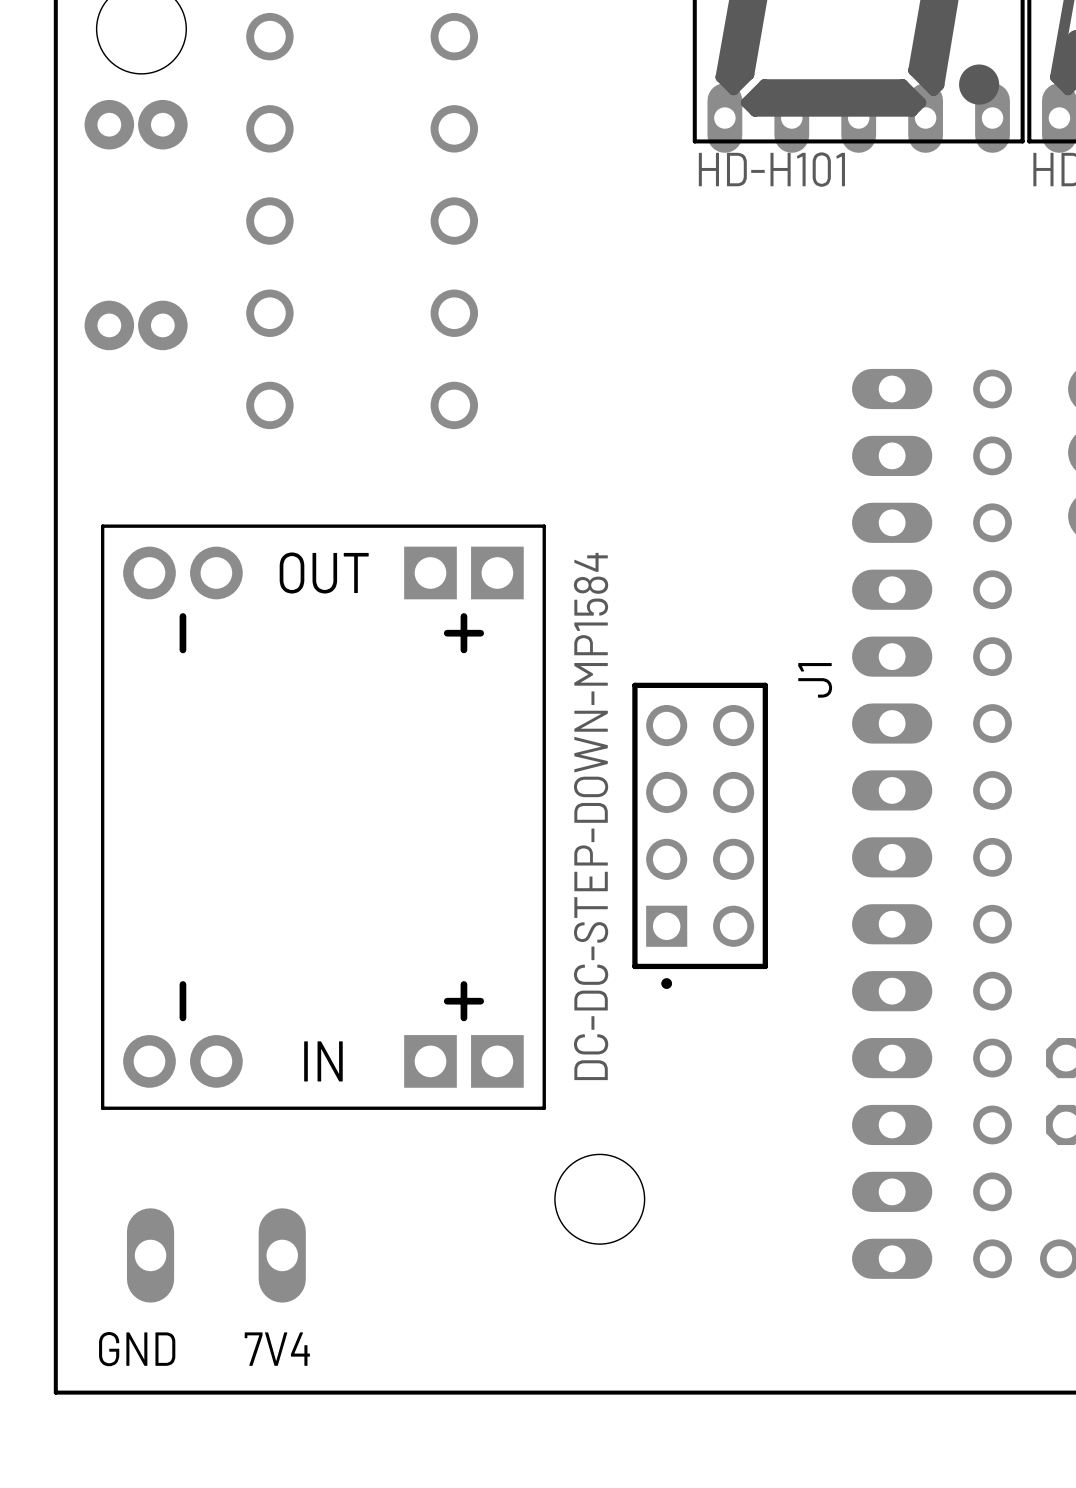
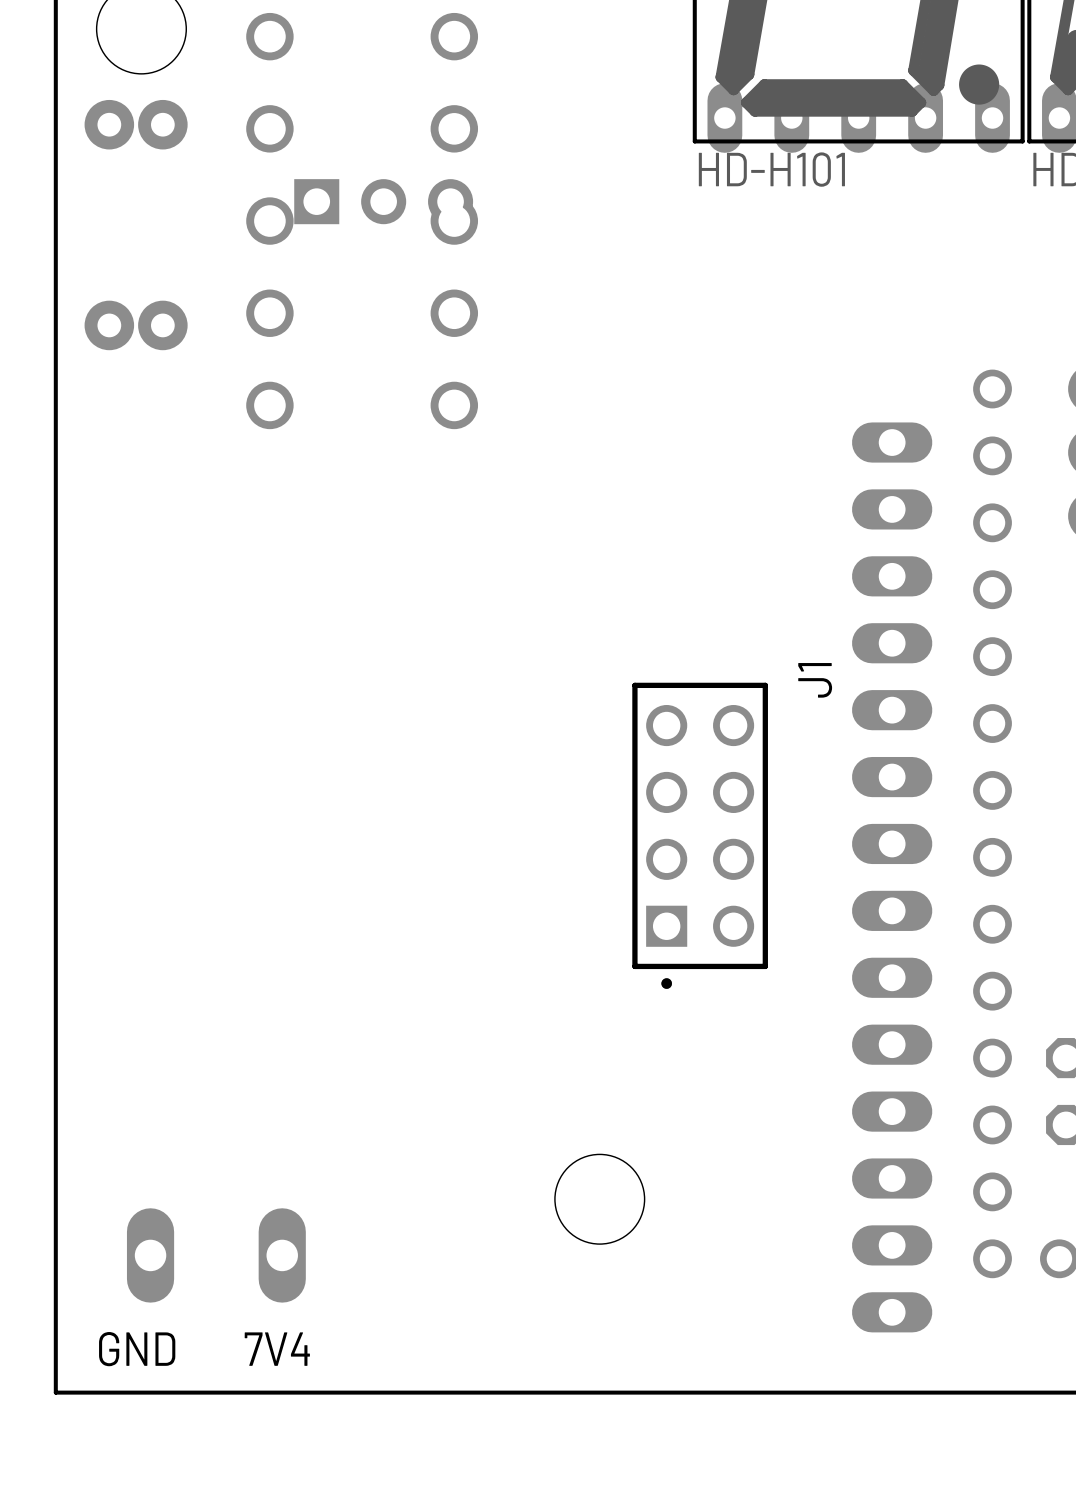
part: none -> (383, 201)
part: DC-DC-STEP-DOWN-MP1584 (323, 817) -> none
part position: (892, 823) -> (892, 877)

